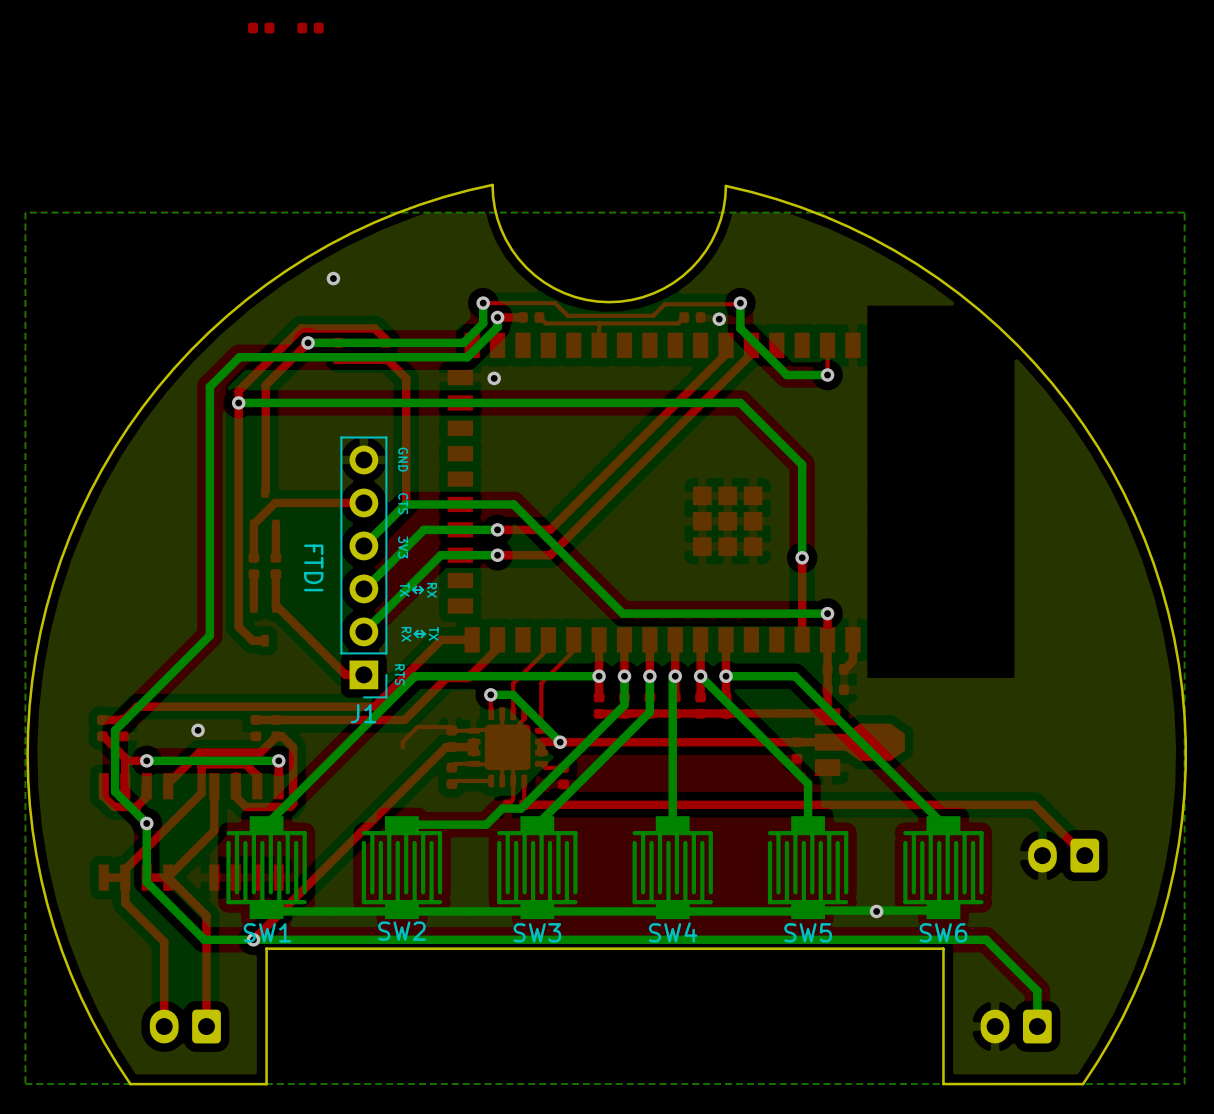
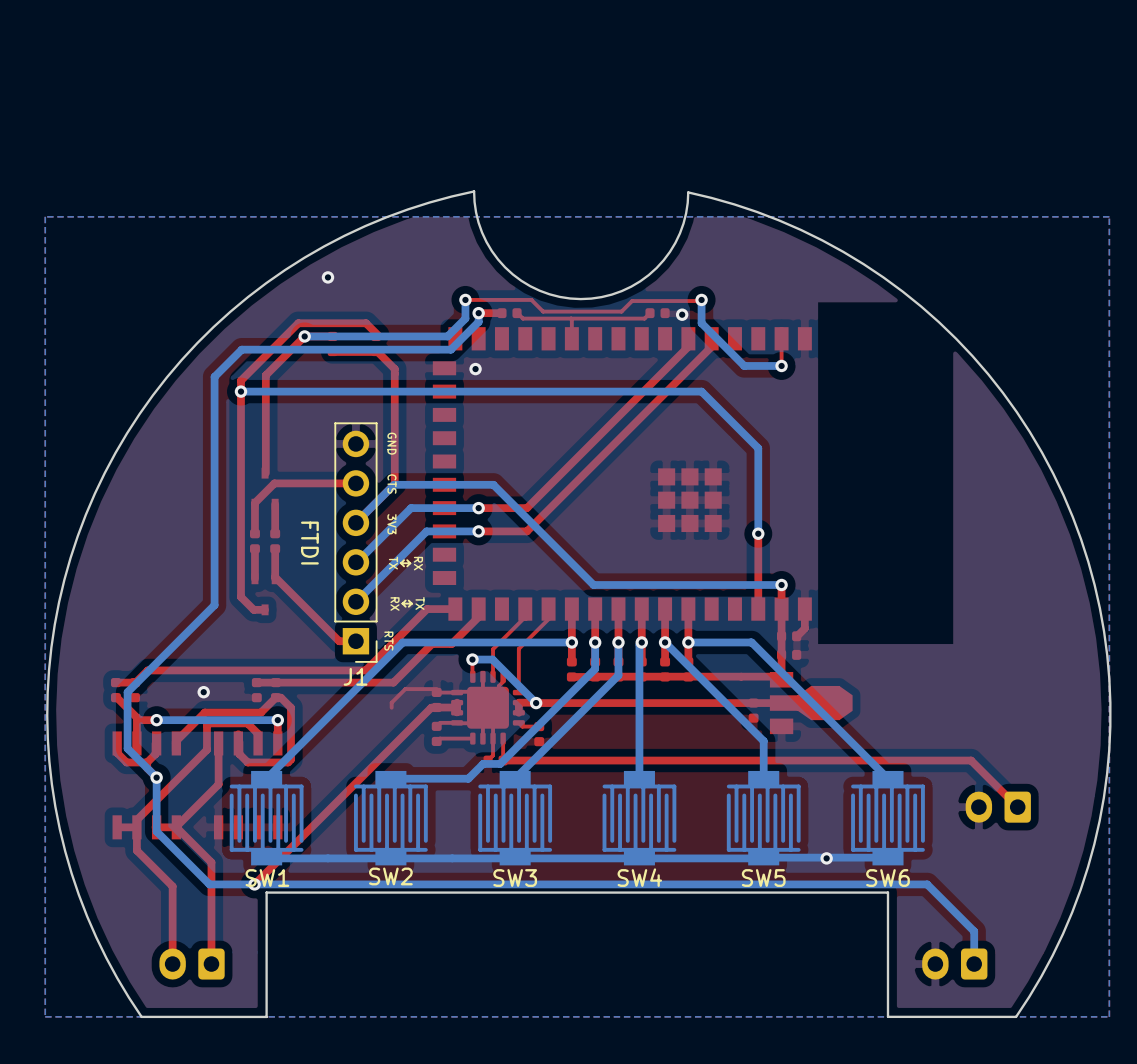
part: (261, 28) -> none
part: (310, 28) -> none

